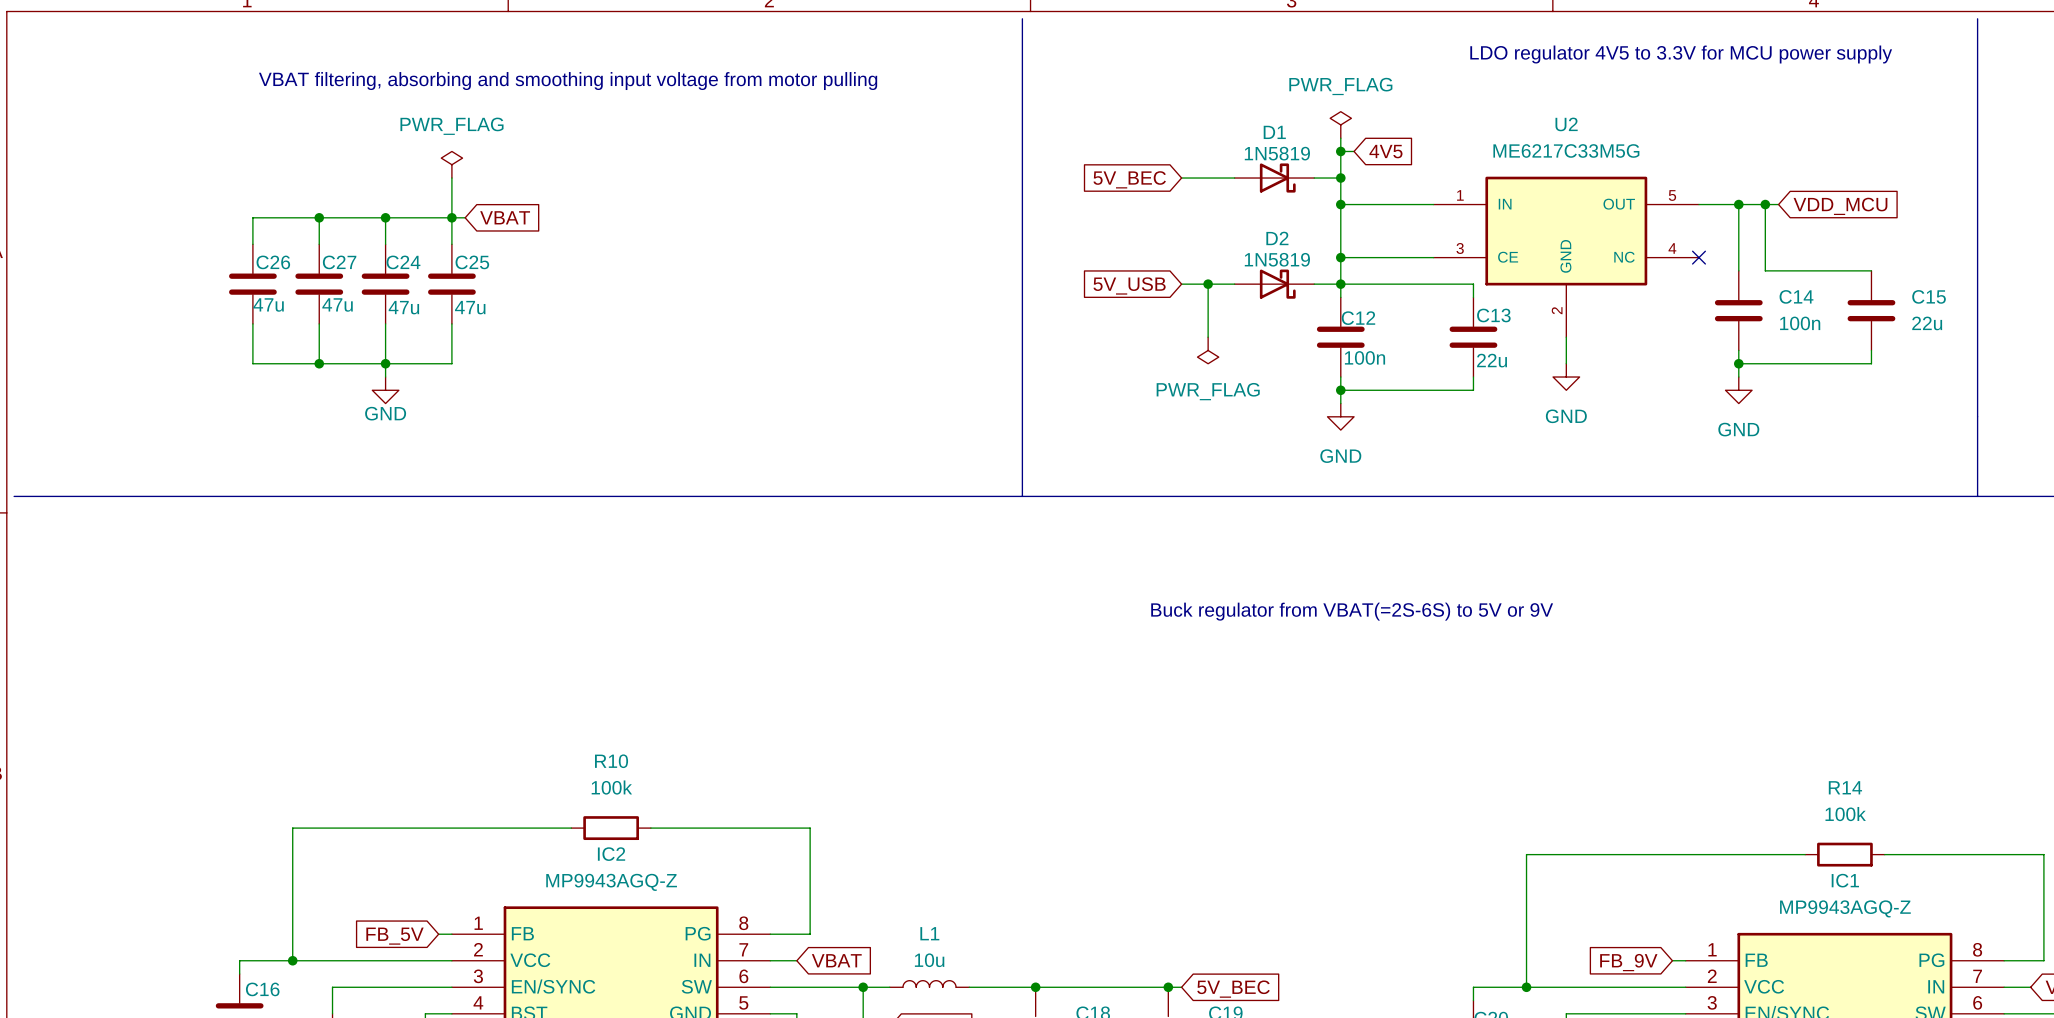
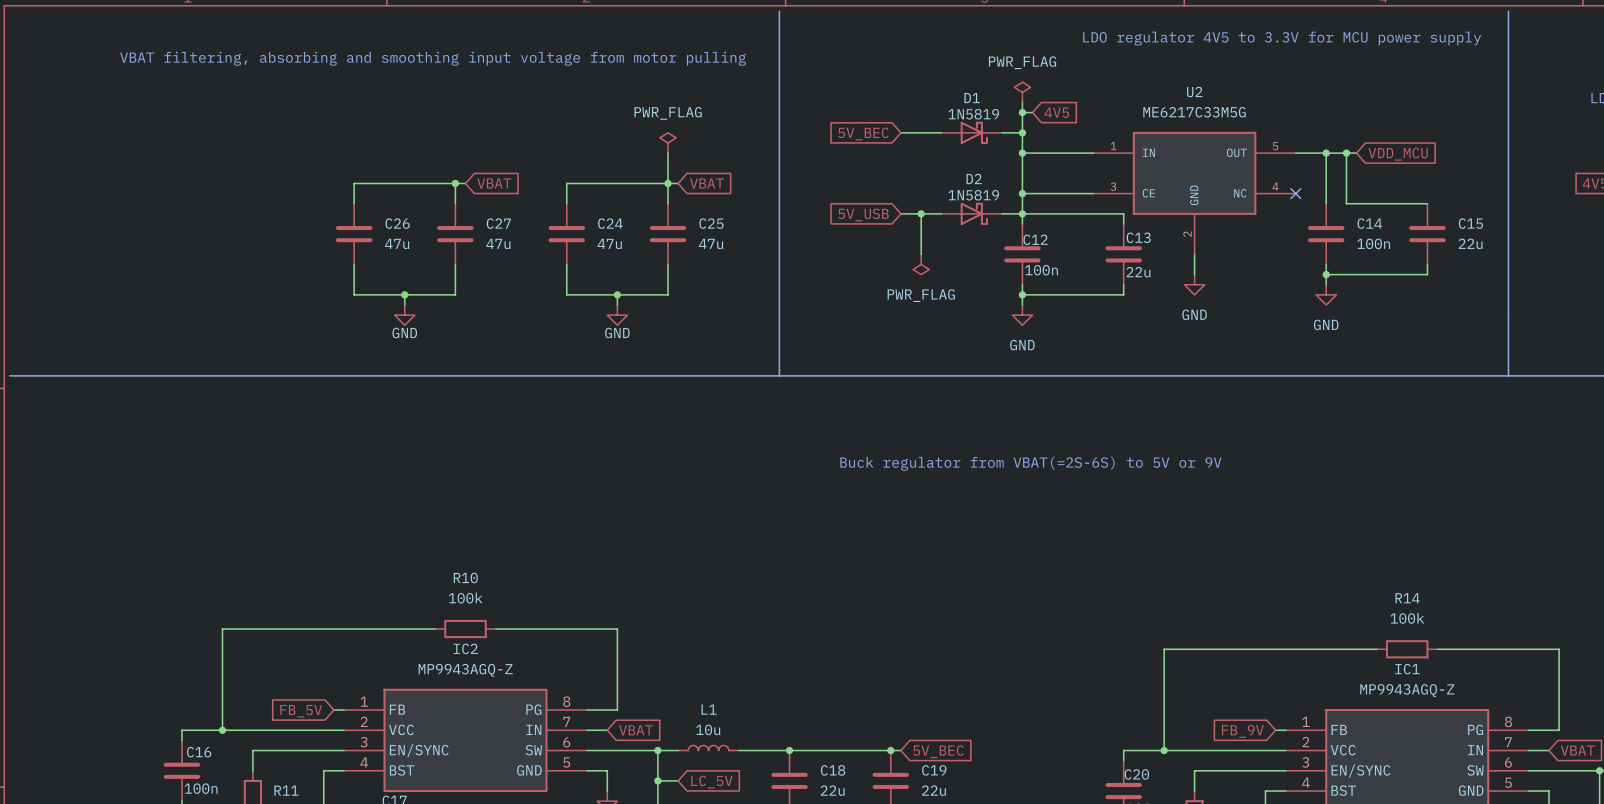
power symbol: PWR_FLAG (451, 164) -> none
wire: (451, 178) (451, 244) -> none
power symbol: none -> PWR_FLAG (668, 142)
wire: none -> (668, 153) (668, 203)
wire: (319, 217) (319, 244) -> none
junction: (319, 217) -> none
wire: (385, 217) (385, 244) -> (455, 183) (455, 203)
junction: (385, 217) -> none
junction: (451, 217) -> none
wire: (465, 217) (252, 217) (252, 244) -> none
global label position: VBAT (505, 217) -> VBAT (494, 183)
junction: none -> (455, 183)
wire: none -> (465, 183) (354, 183) (354, 203)
junction: none -> (668, 183)
wire: none -> (678, 183) (566, 183) (566, 203)
global label: none -> VBAT (707, 183)
C26 name position: C26 (273, 262) -> C26 (397, 223)
C27 name position: C27 (339, 262) -> C27 (498, 223)
C24 name position: C24 (403, 262) -> C24 (610, 223)
C25 name position: C25 (472, 262) -> C25 (711, 223)
C26 position: (252, 284) -> (354, 234)
C27 position: (319, 284) -> (455, 234)
C24 position: (385, 284) -> (566, 234)
C25 position: (451, 284) -> (668, 234)
C26 value position: 47u (268, 304) -> 47u (397, 243)
C27 value position: 47u (337, 304) -> 47u (498, 243)
C24 value position: 47u (403, 307) -> 47u (609, 243)
C25 value position: 47u (470, 307) -> 47u (711, 243)
wire: (252, 323) (252, 363) (451, 363) (451, 323) -> none
wire: (319, 323) (319, 363) -> none
wire: (385, 323) (385, 377) -> none
wire: none -> (354, 264) (354, 294) (455, 294) (455, 264)
wire: none -> (566, 264) (566, 294) (668, 294) (668, 264)
junction: (319, 363) -> none
junction: (385, 363) -> none
power symbol position: GND (385, 390) -> GND (404, 315)
wire: none -> (404, 294) (404, 304)
junction: none -> (404, 294)
wire: none -> (617, 294) (617, 304)
junction: none -> (617, 294)
power symbol: none -> GND (617, 315)

